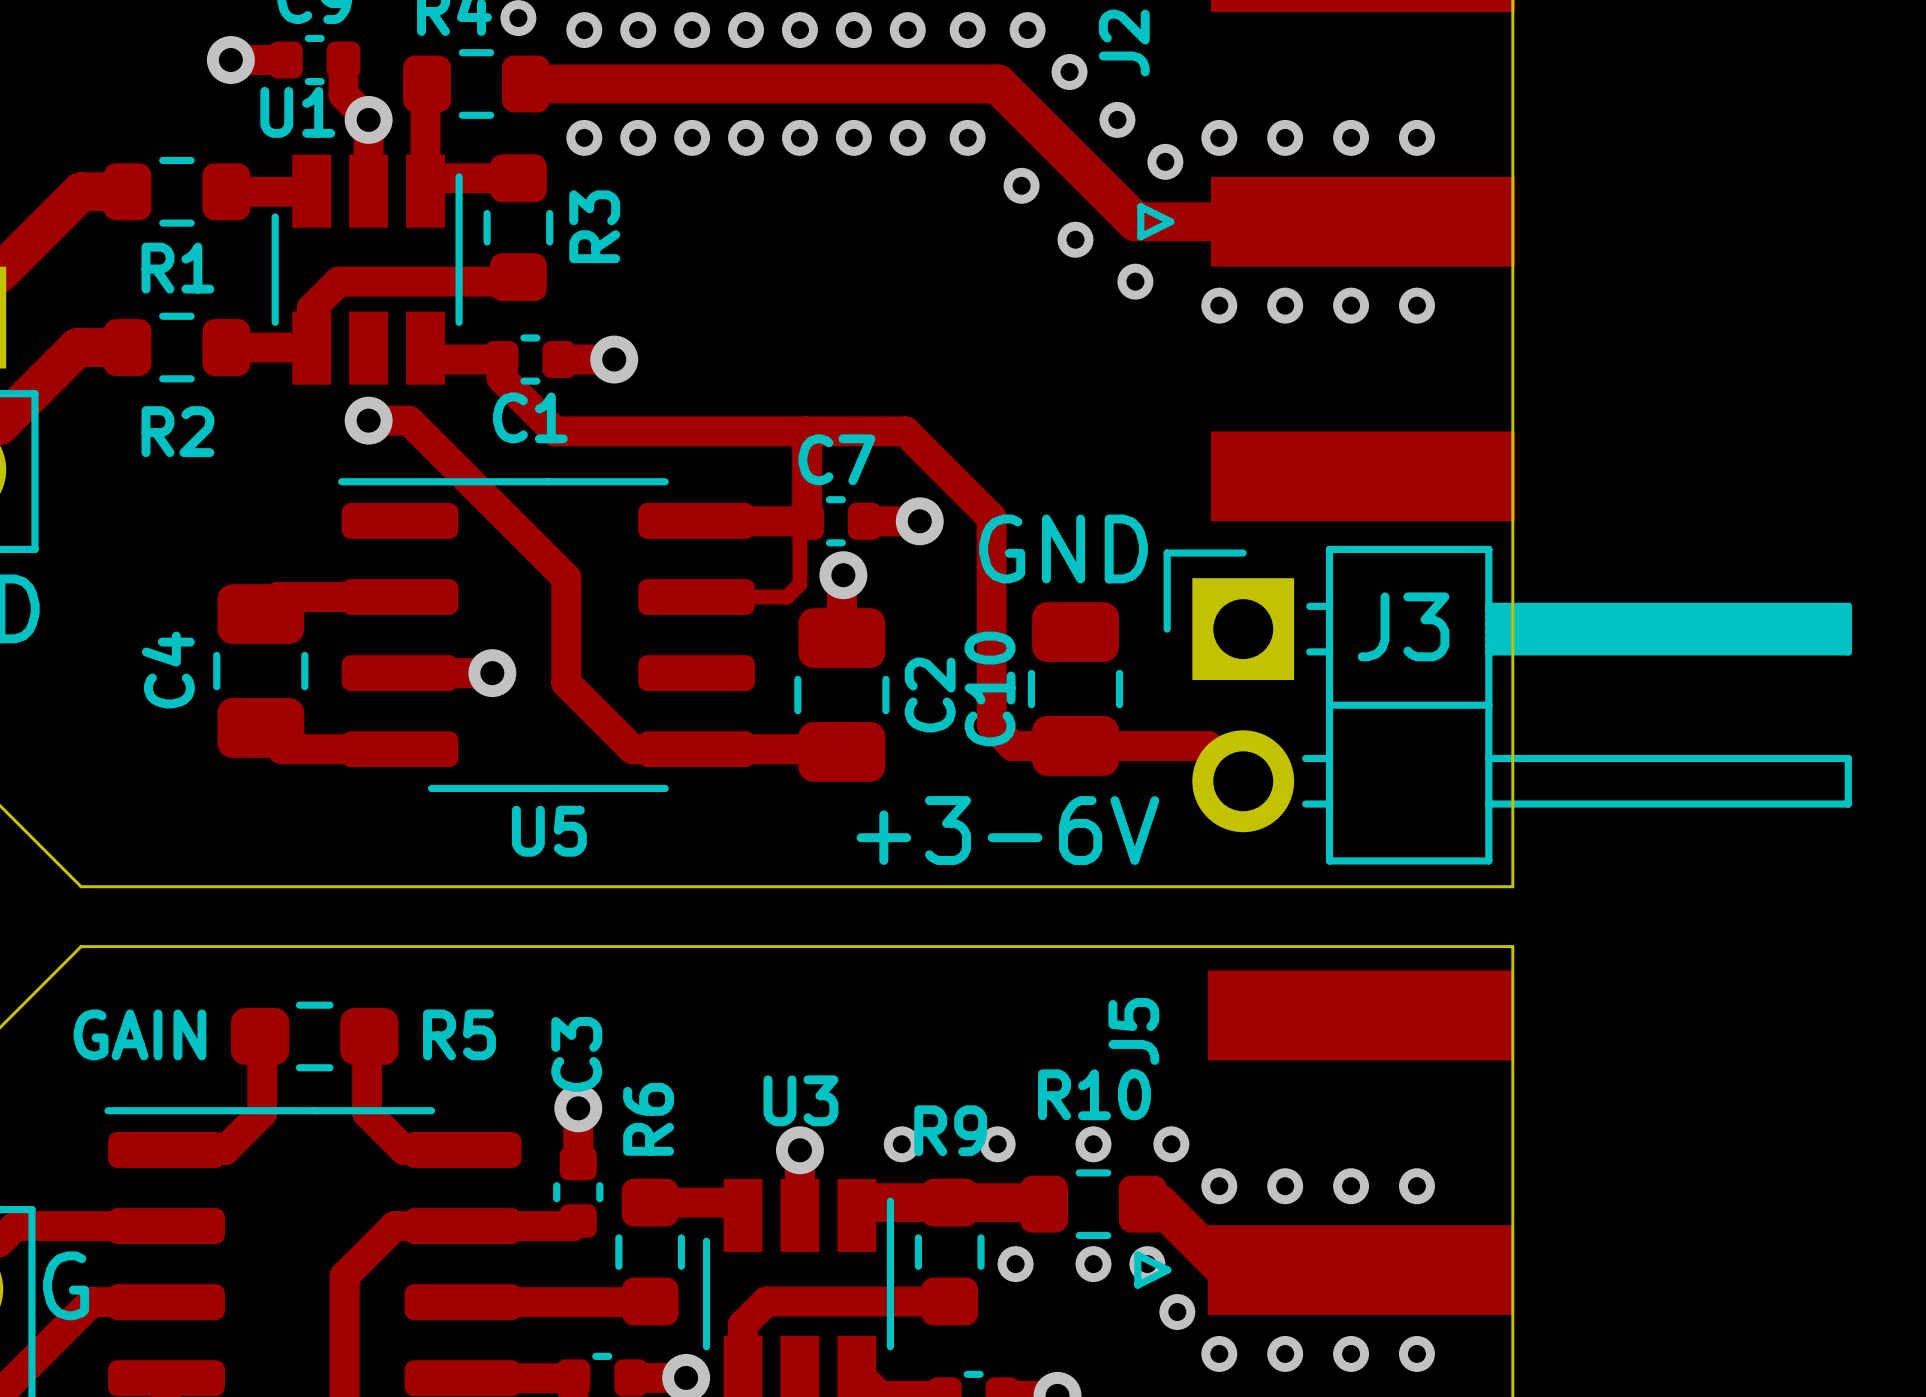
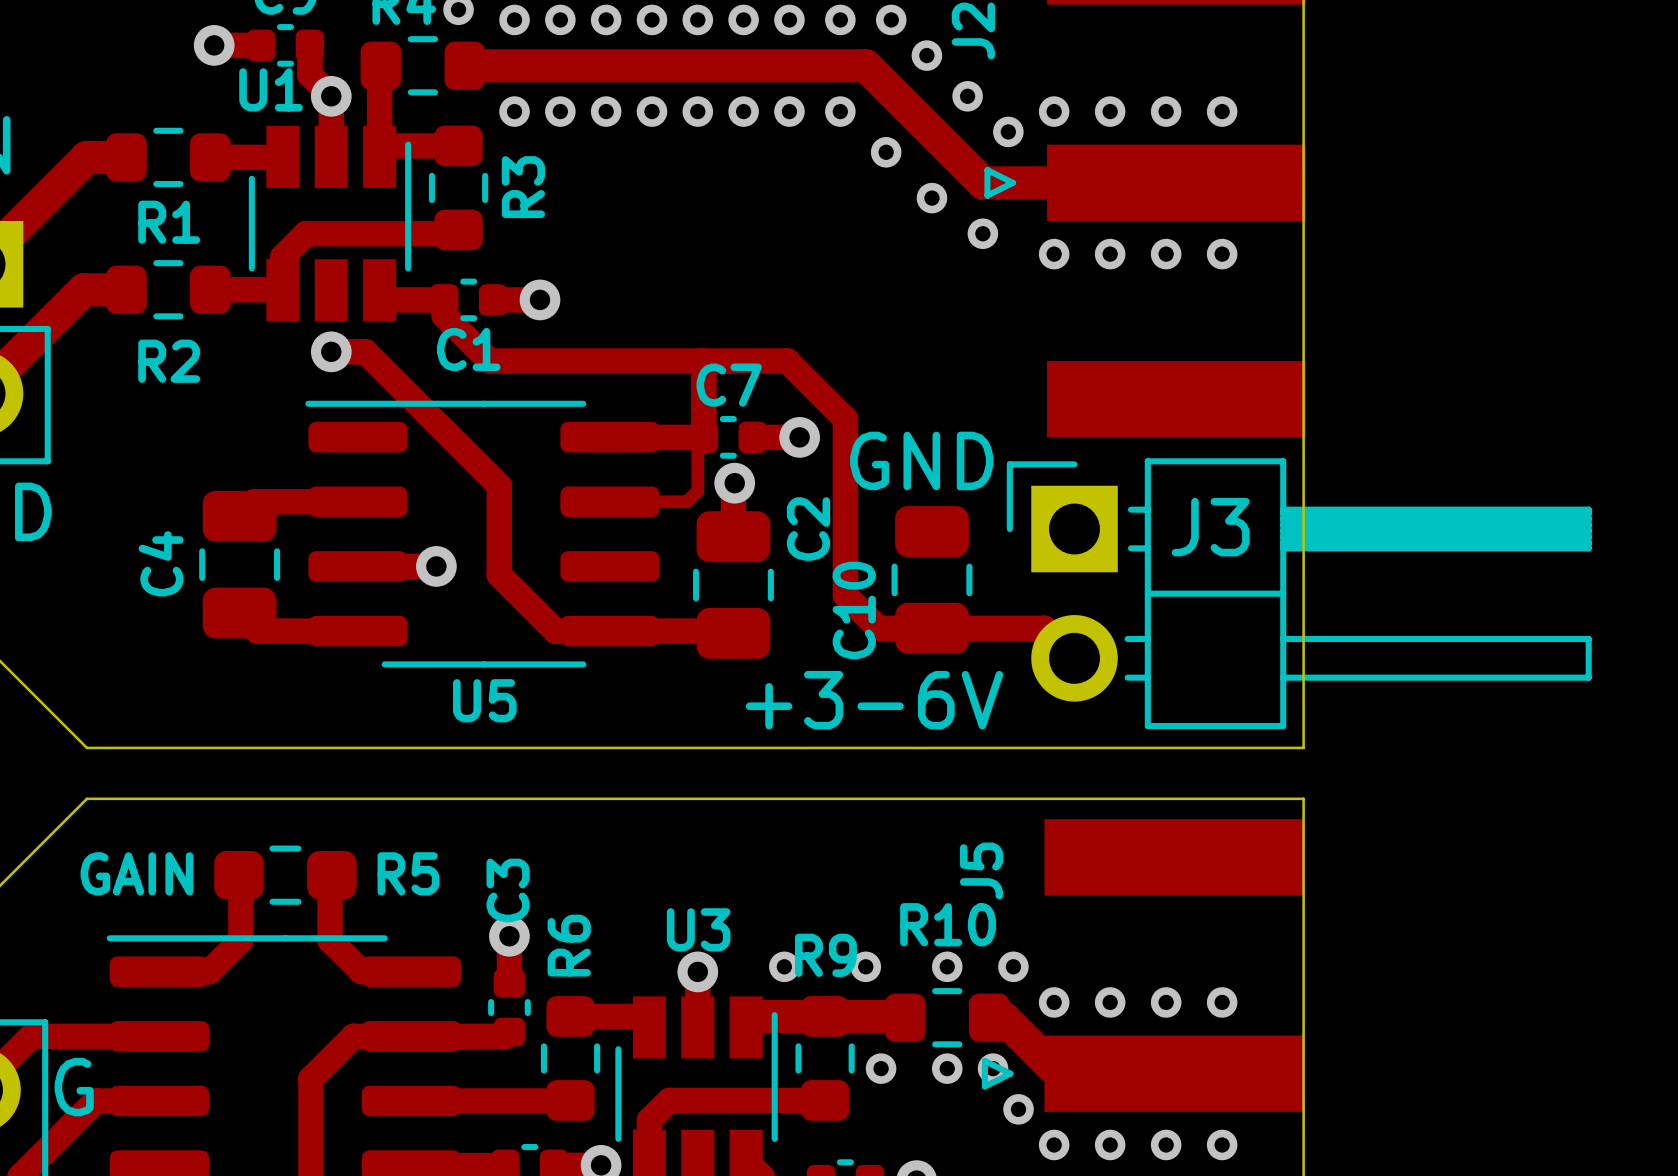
track: (973, 499) (991, 517) (991, 724) -> (845, 419) (845, 595) (860, 610)
C10 name position: C10 (990, 689) -> C10 (854, 610)
C2 name position: C2 (930, 695) -> C2 (808, 529)

